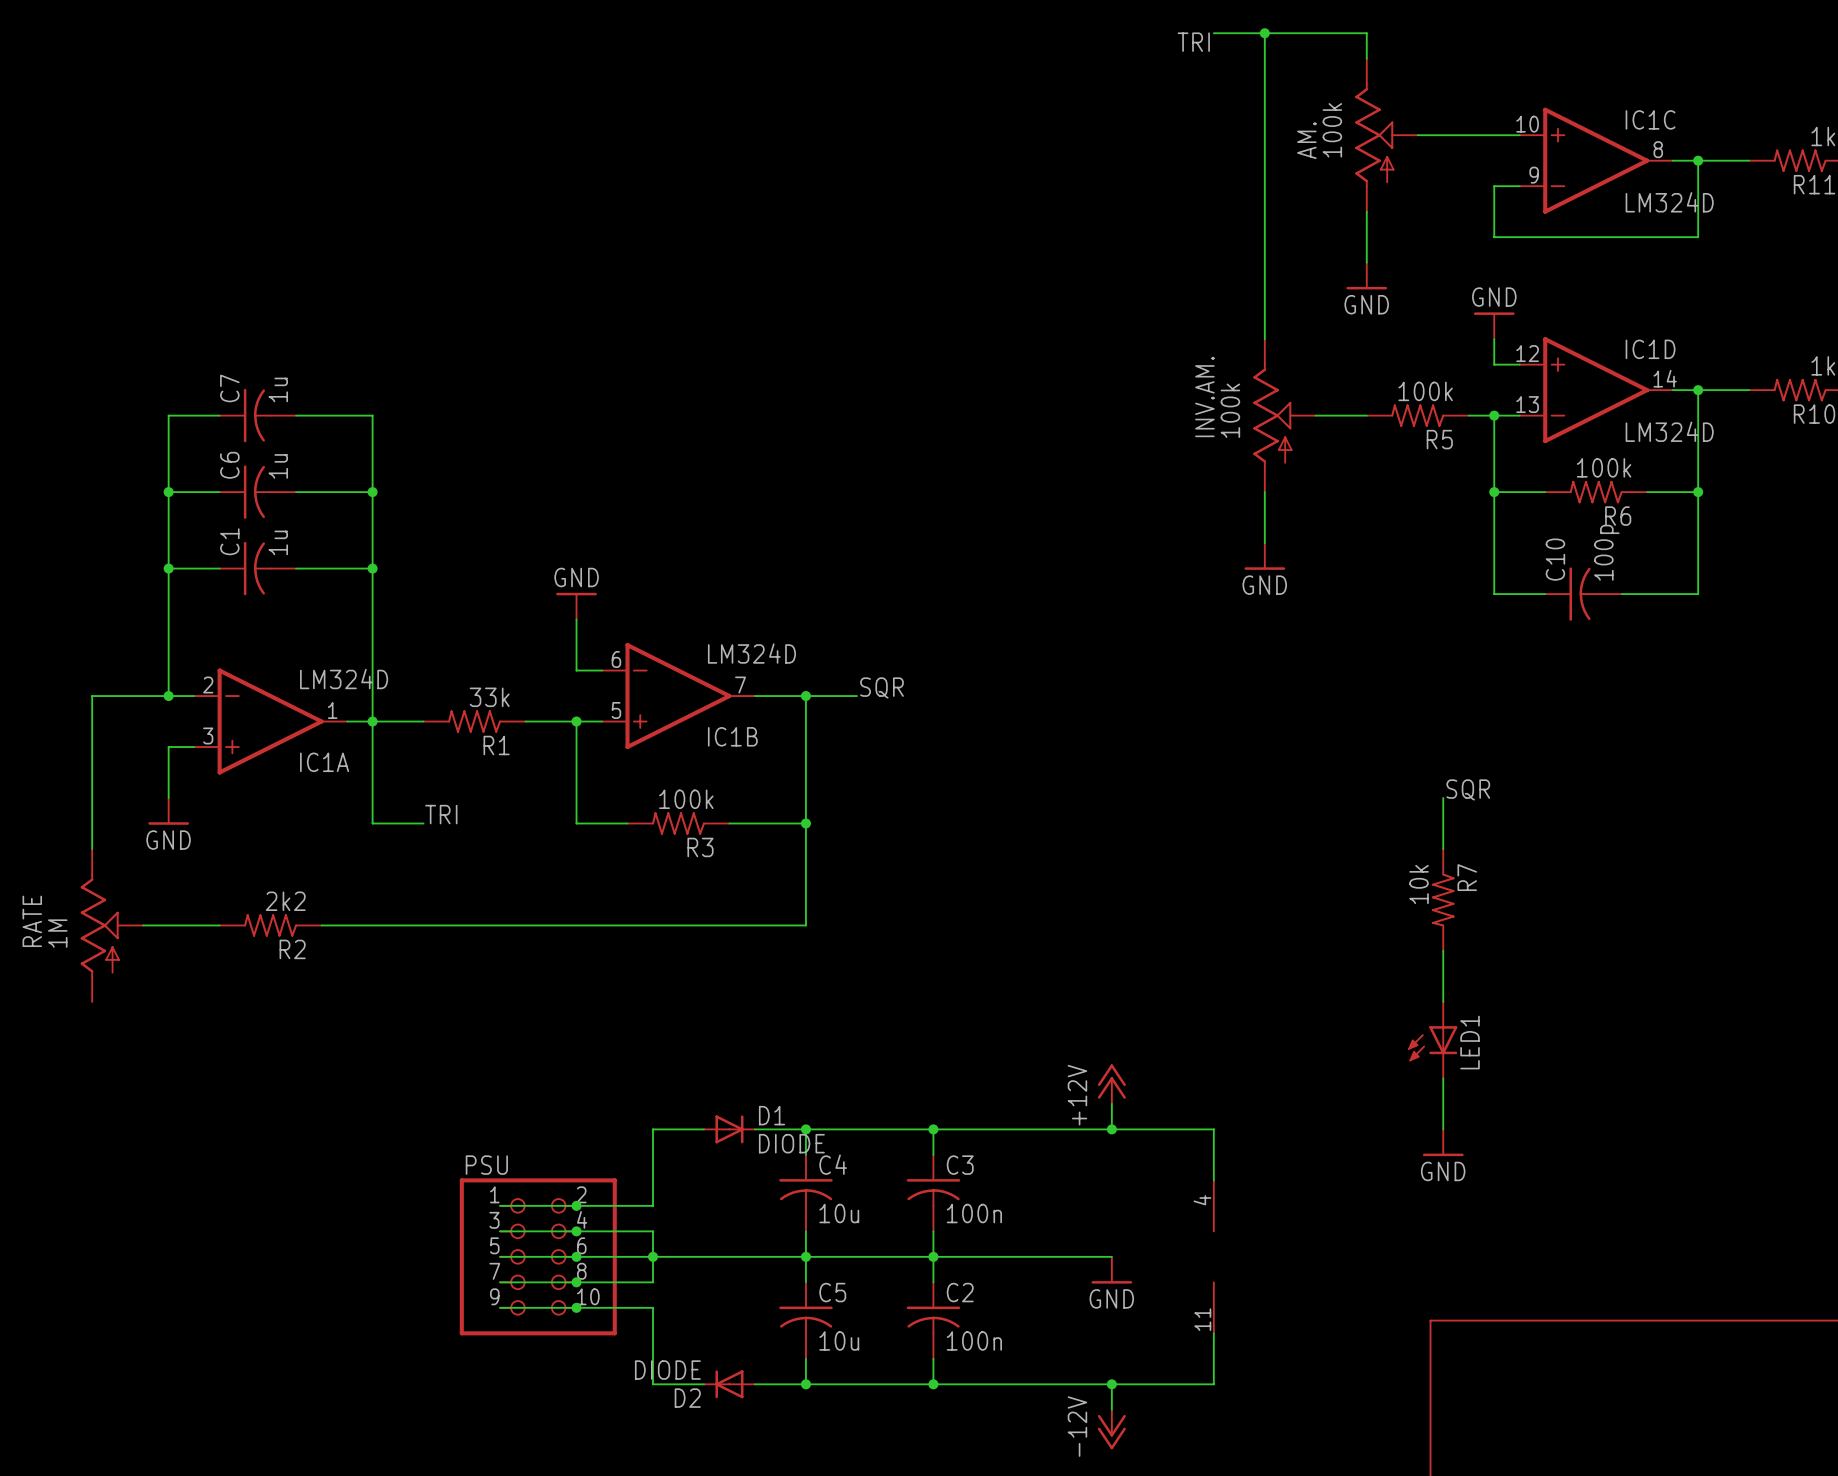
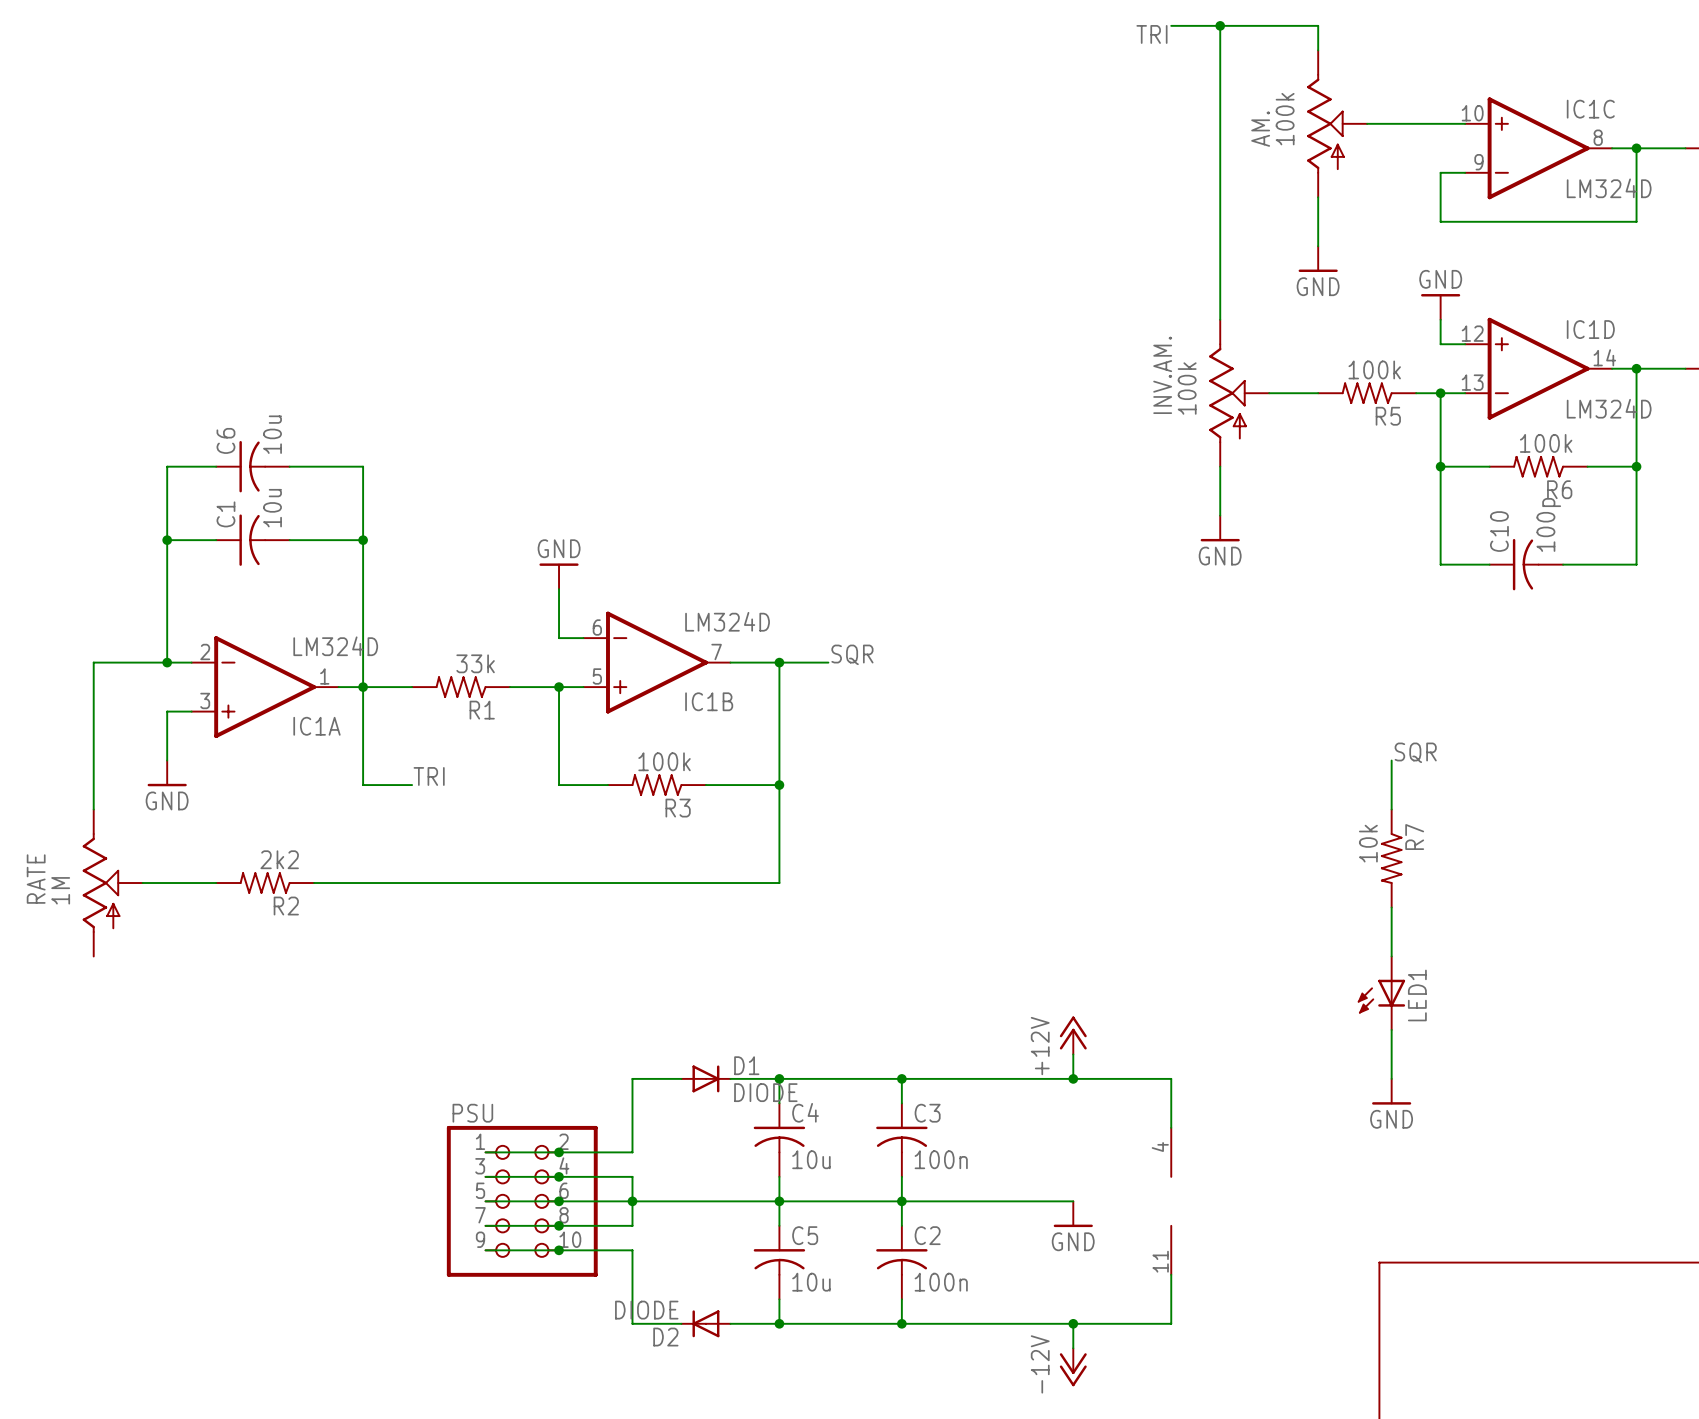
wire: (219, 415) (168, 415) (168, 492) -> none
C7: 1u (257, 415) -> none
wire: (296, 415) (372, 415) (372, 492) -> none
C6 value: 1u (278, 466) -> 10u (272, 434)
junction: (168, 492) -> none
junction: (372, 492) -> none
C1 value: 1u (278, 542) -> 10u (272, 508)

